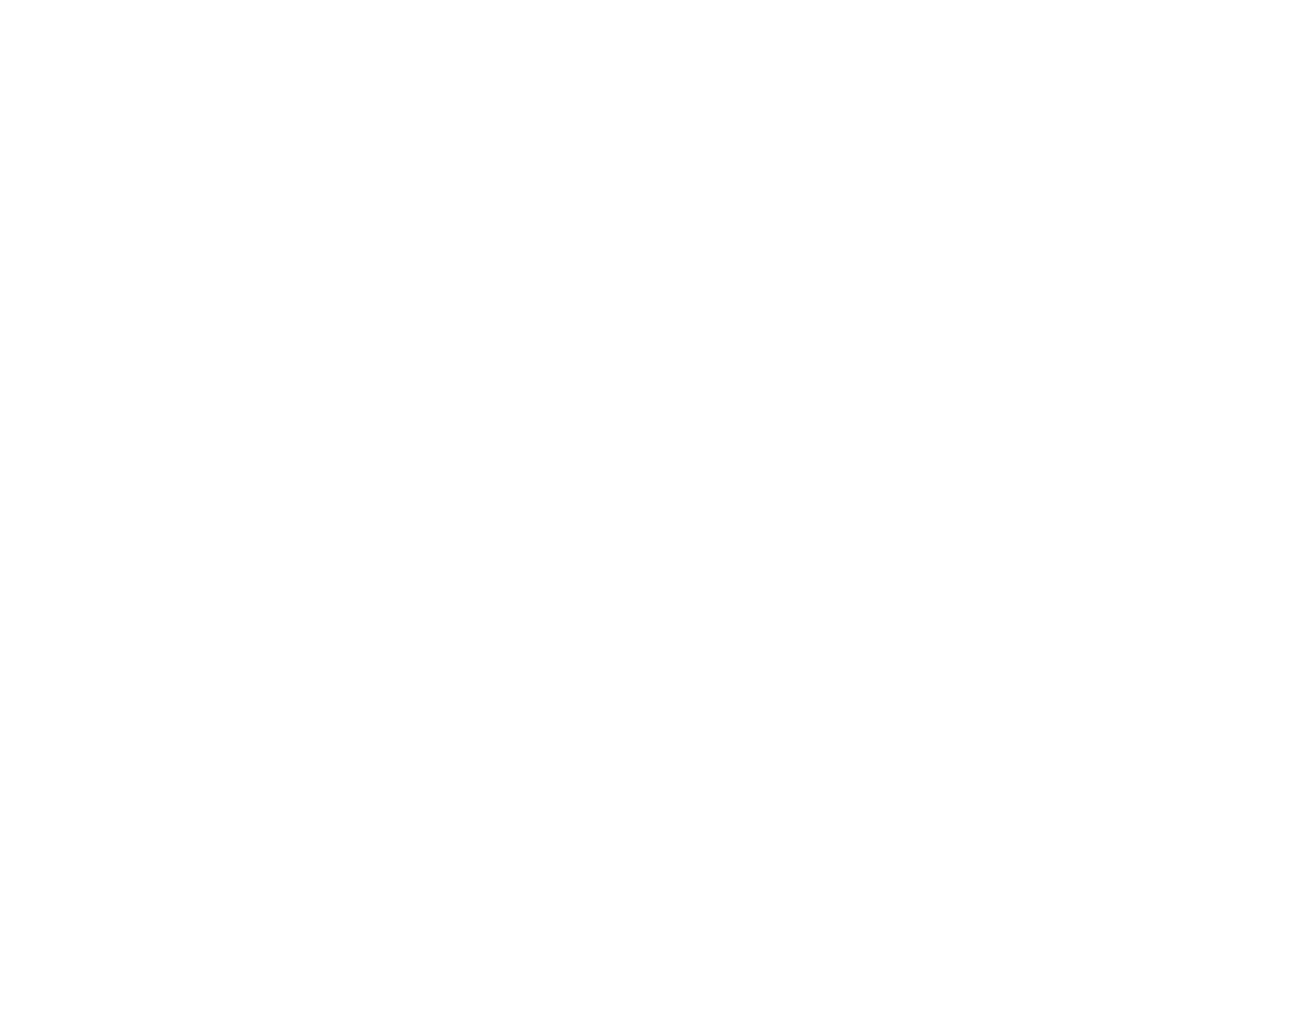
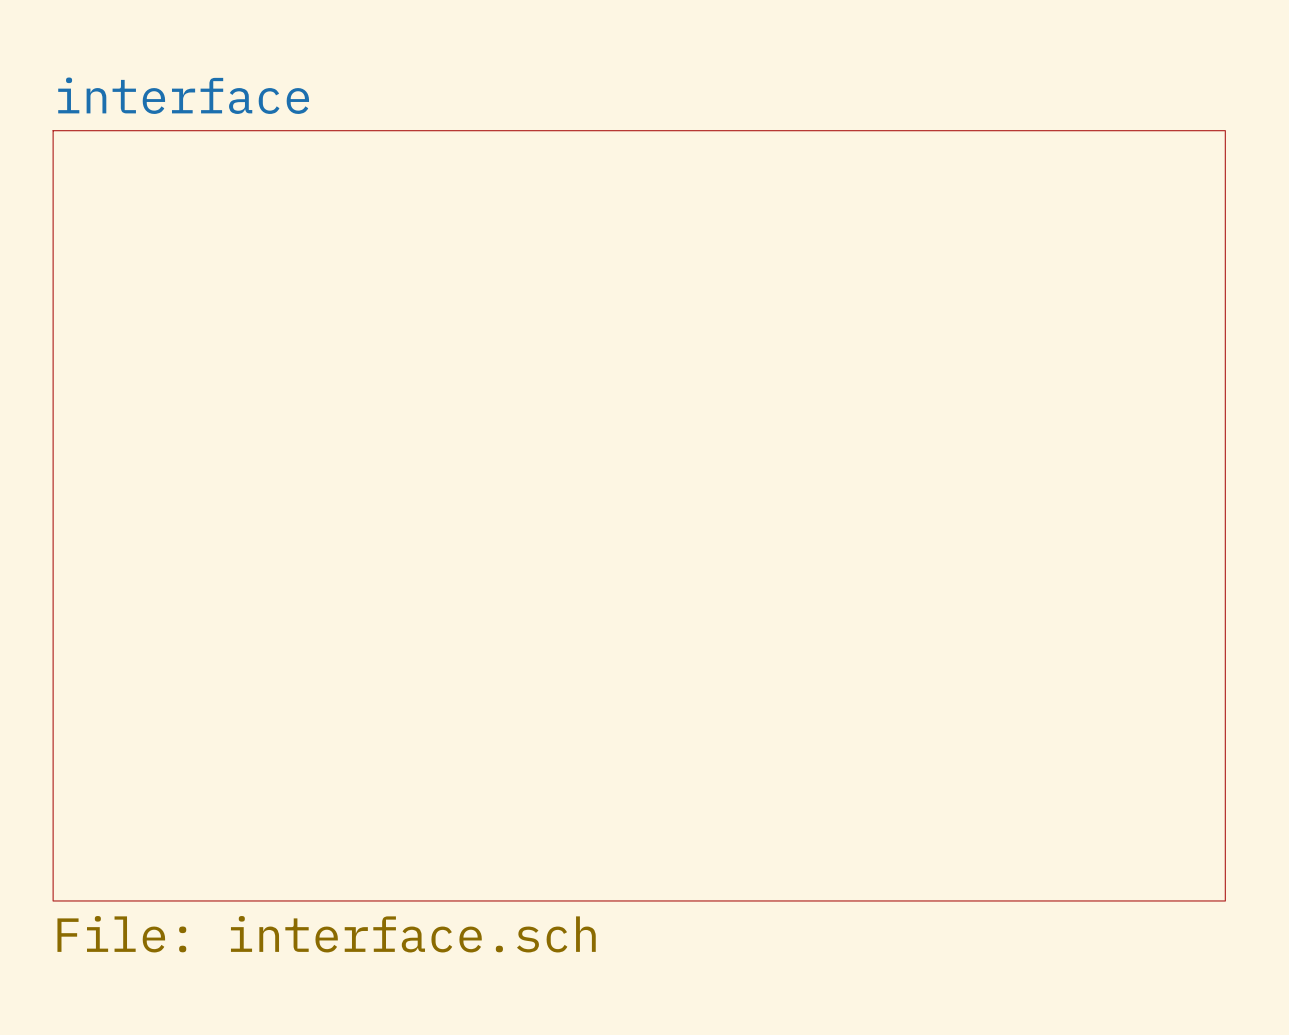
sheet interface: none -> File: interface.sch (639, 515)

